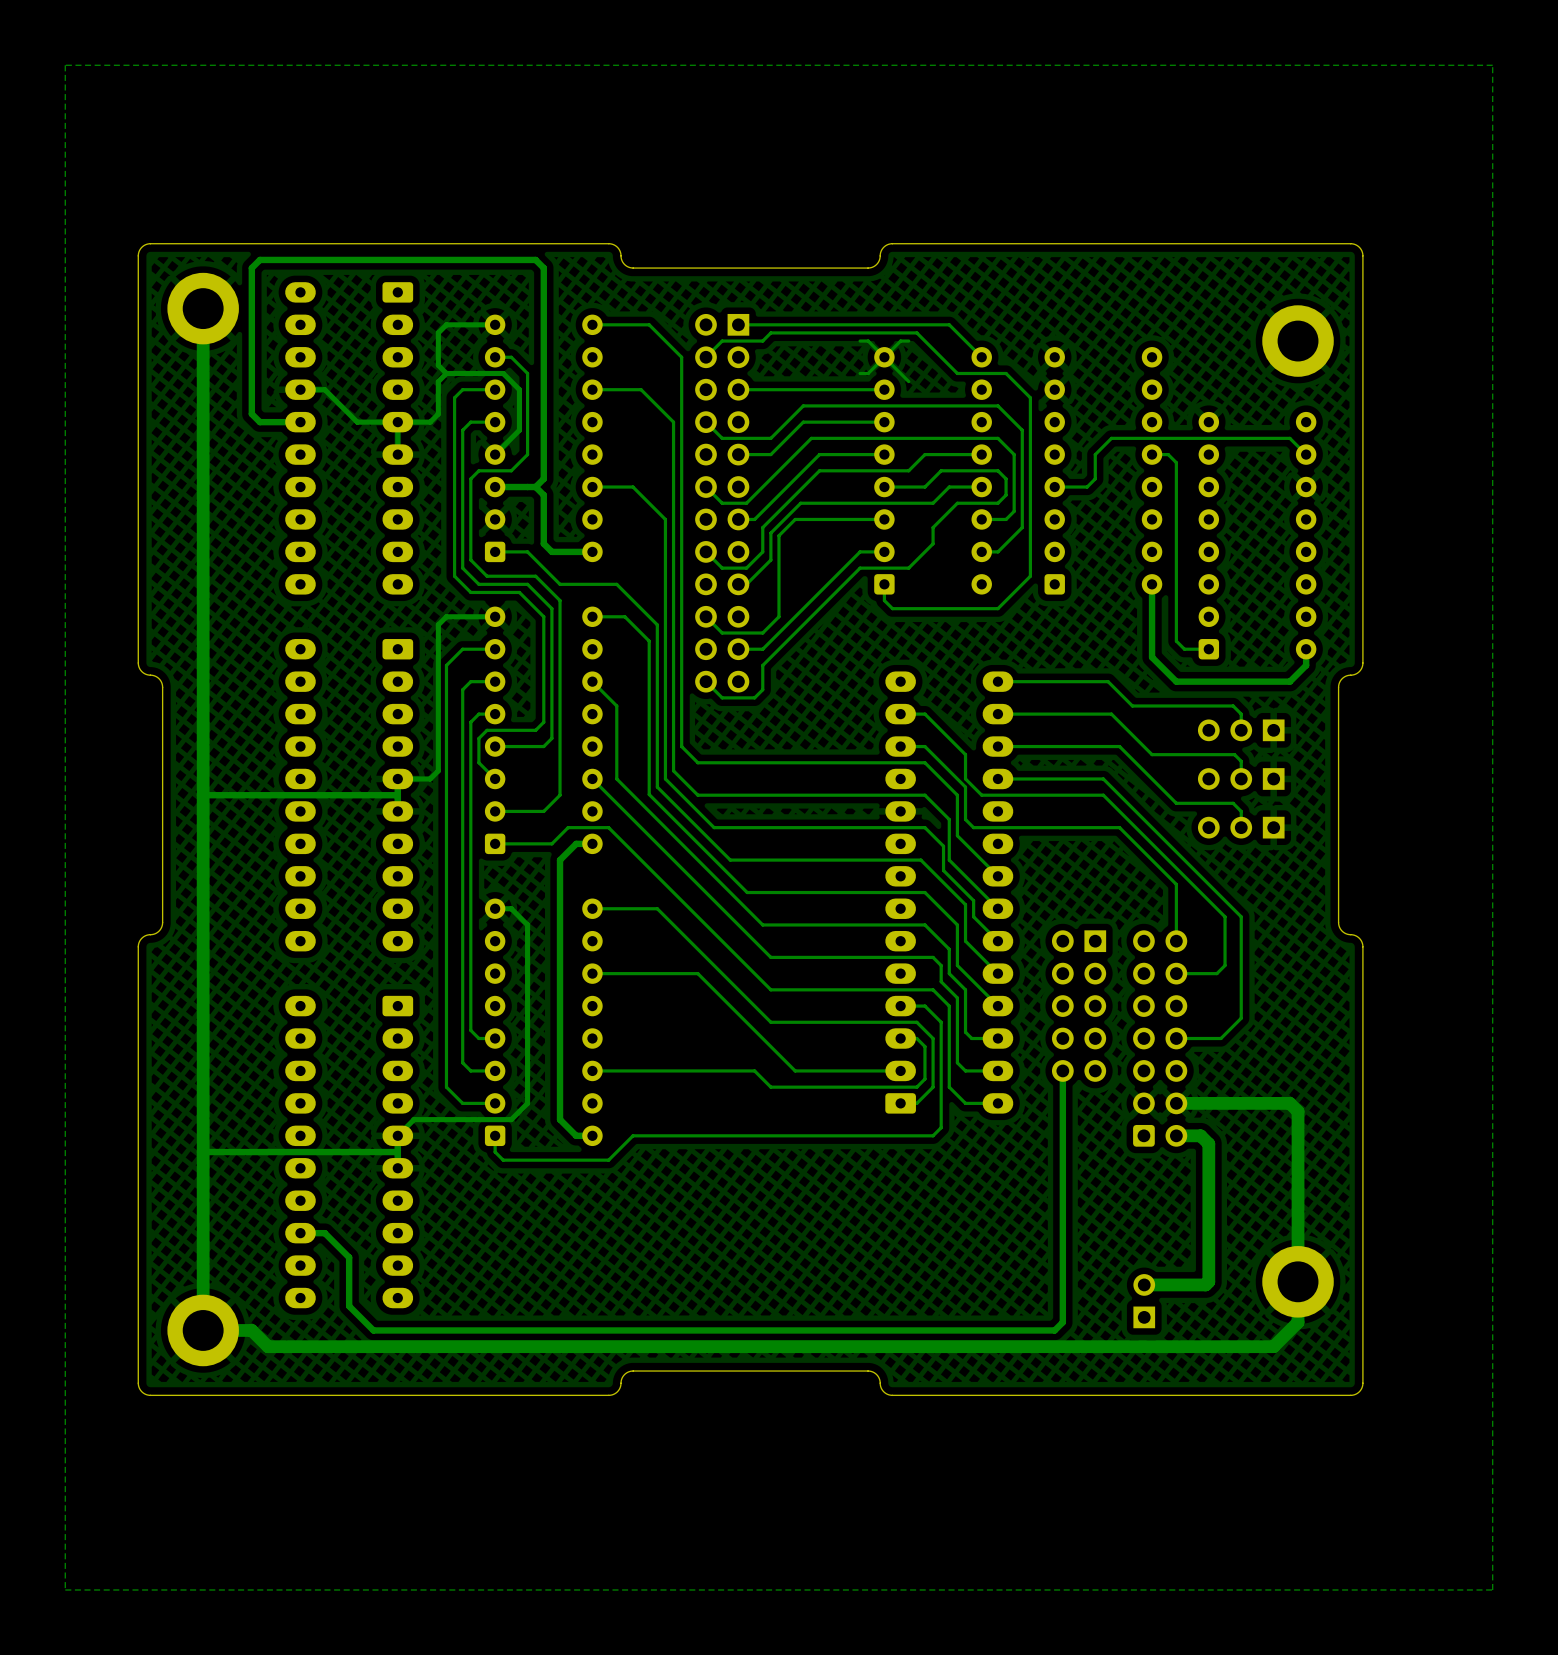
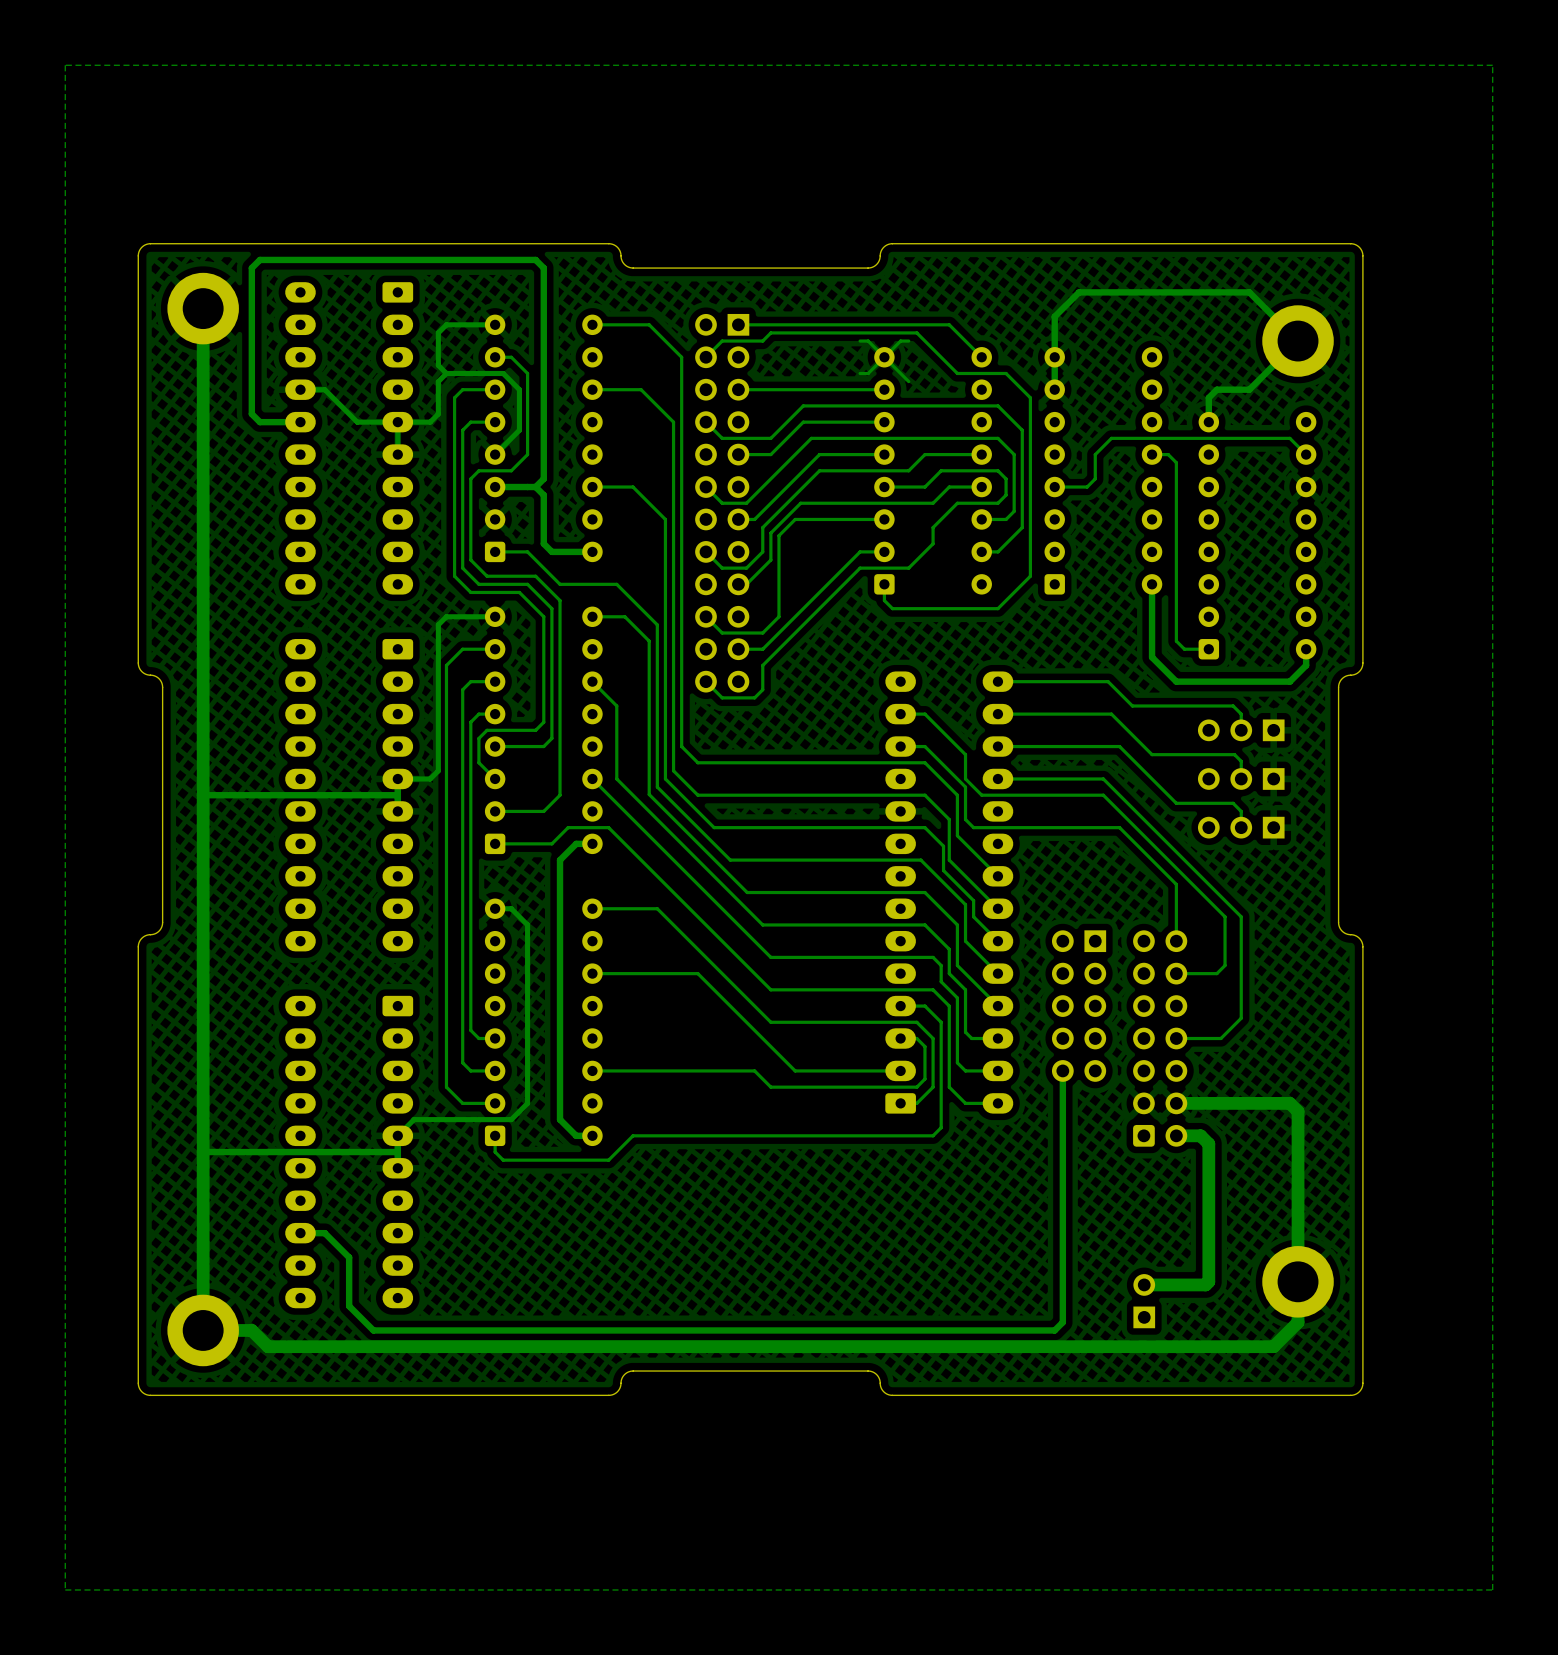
track: none -> (1054, 389) (1054, 316) (1079, 292) (1249, 292) (1298, 341) (1249, 389) (1216, 389) (1208, 397) (1208, 422)

